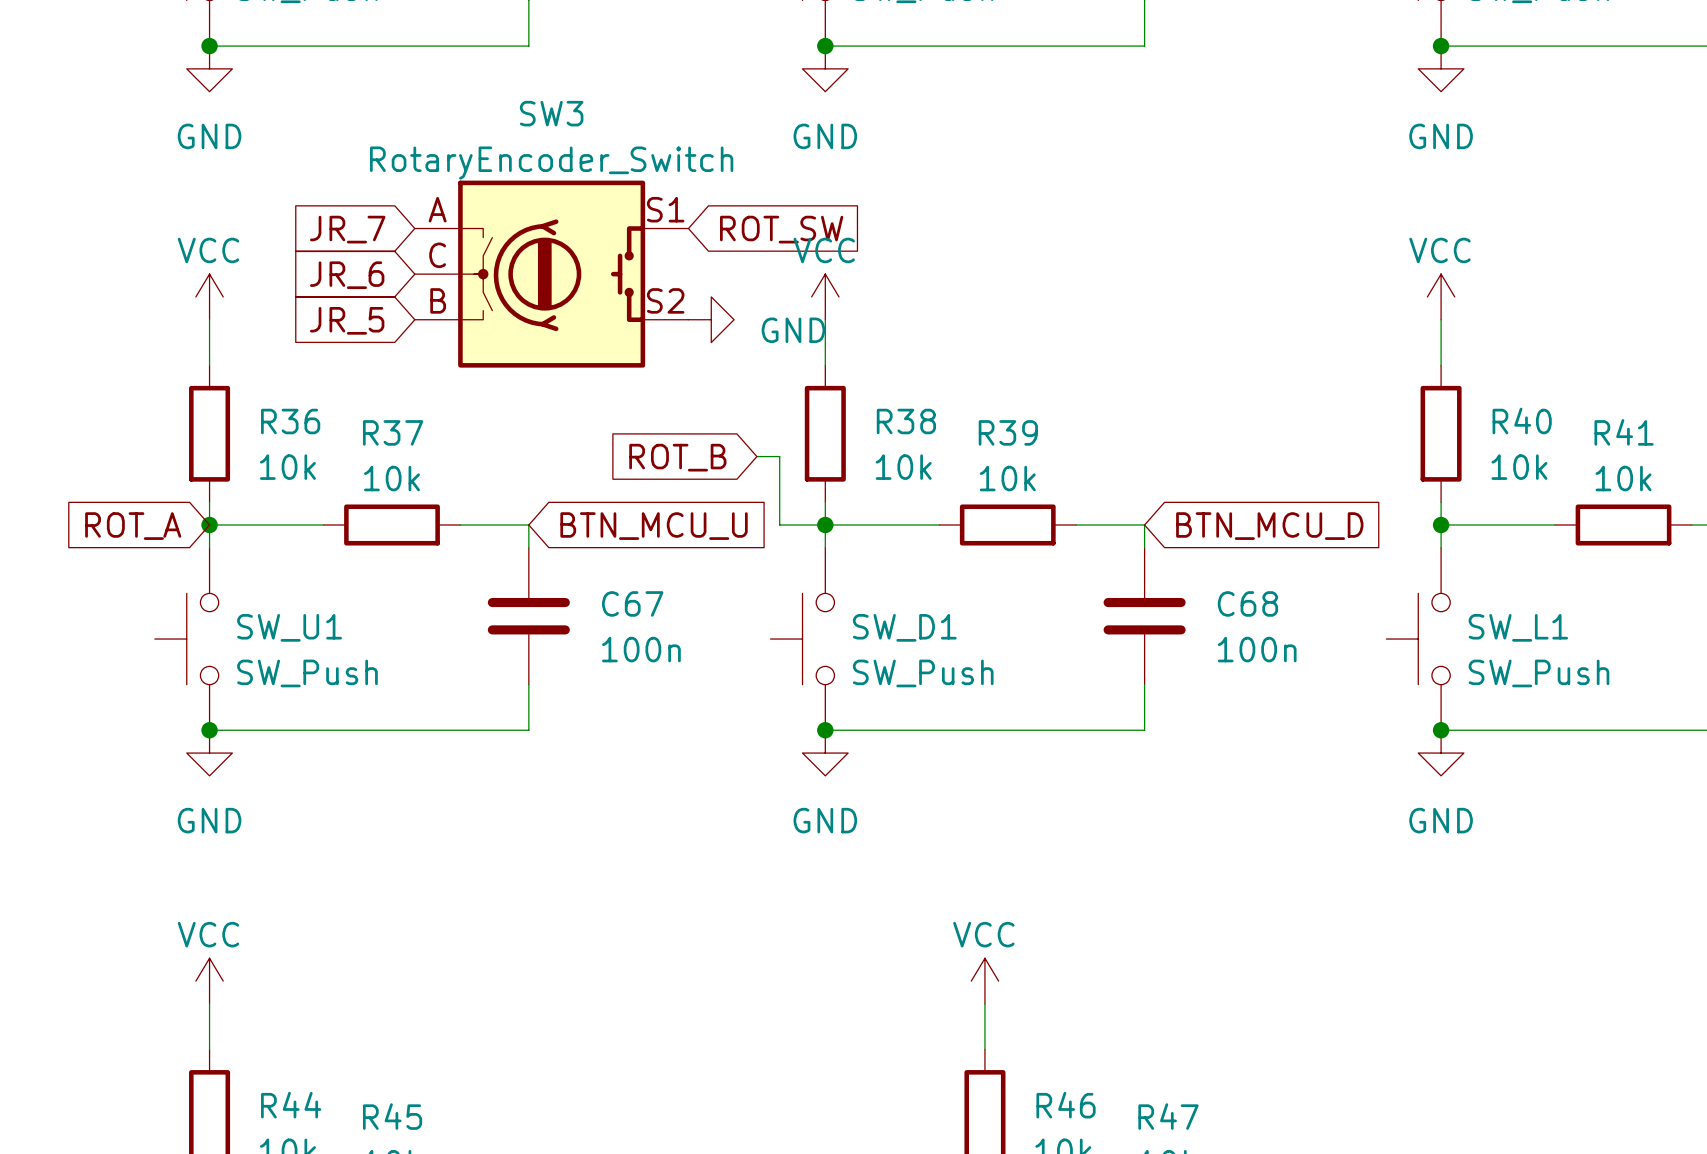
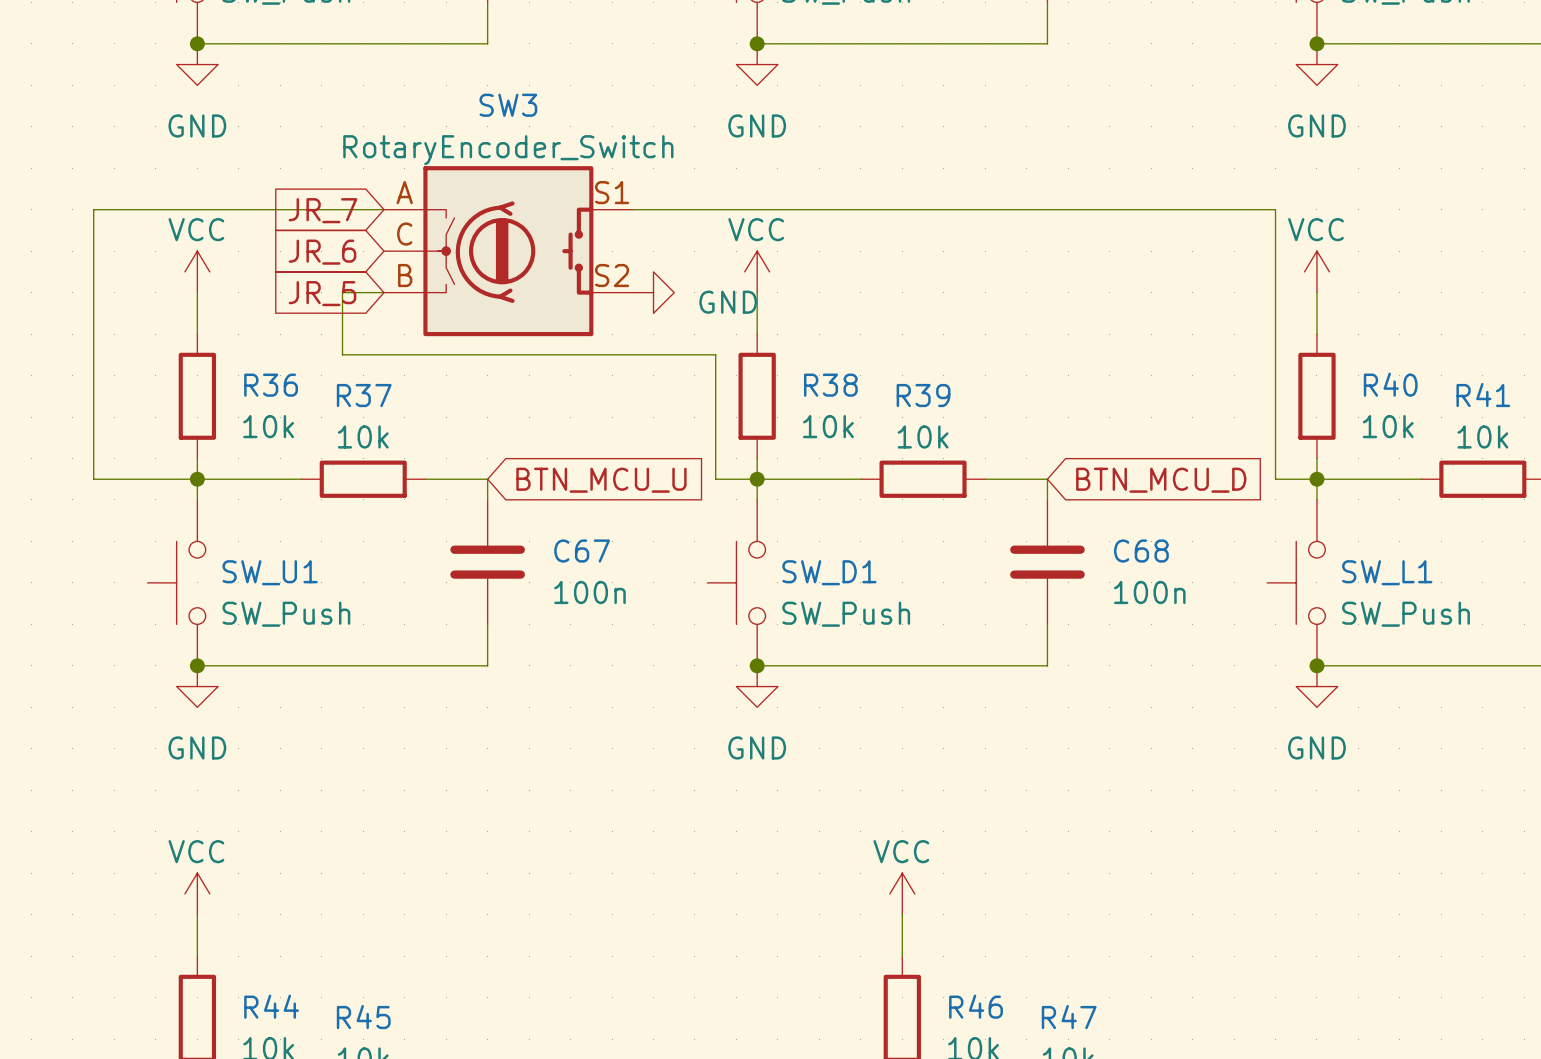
wire: none -> (383, 209) (93, 209) (93, 479) (197, 479)
wire: none -> (632, 209) (1275, 209) (1275, 479) (1316, 479)
global label: ROT_SW (781, 229) -> none
wire: (756, 456) (779, 456) -> (383, 292) (342, 292) (342, 354) (715, 354) (715, 417)
global label: ROT_B (677, 457) -> none
global label: ROT_A (133, 526) -> none

